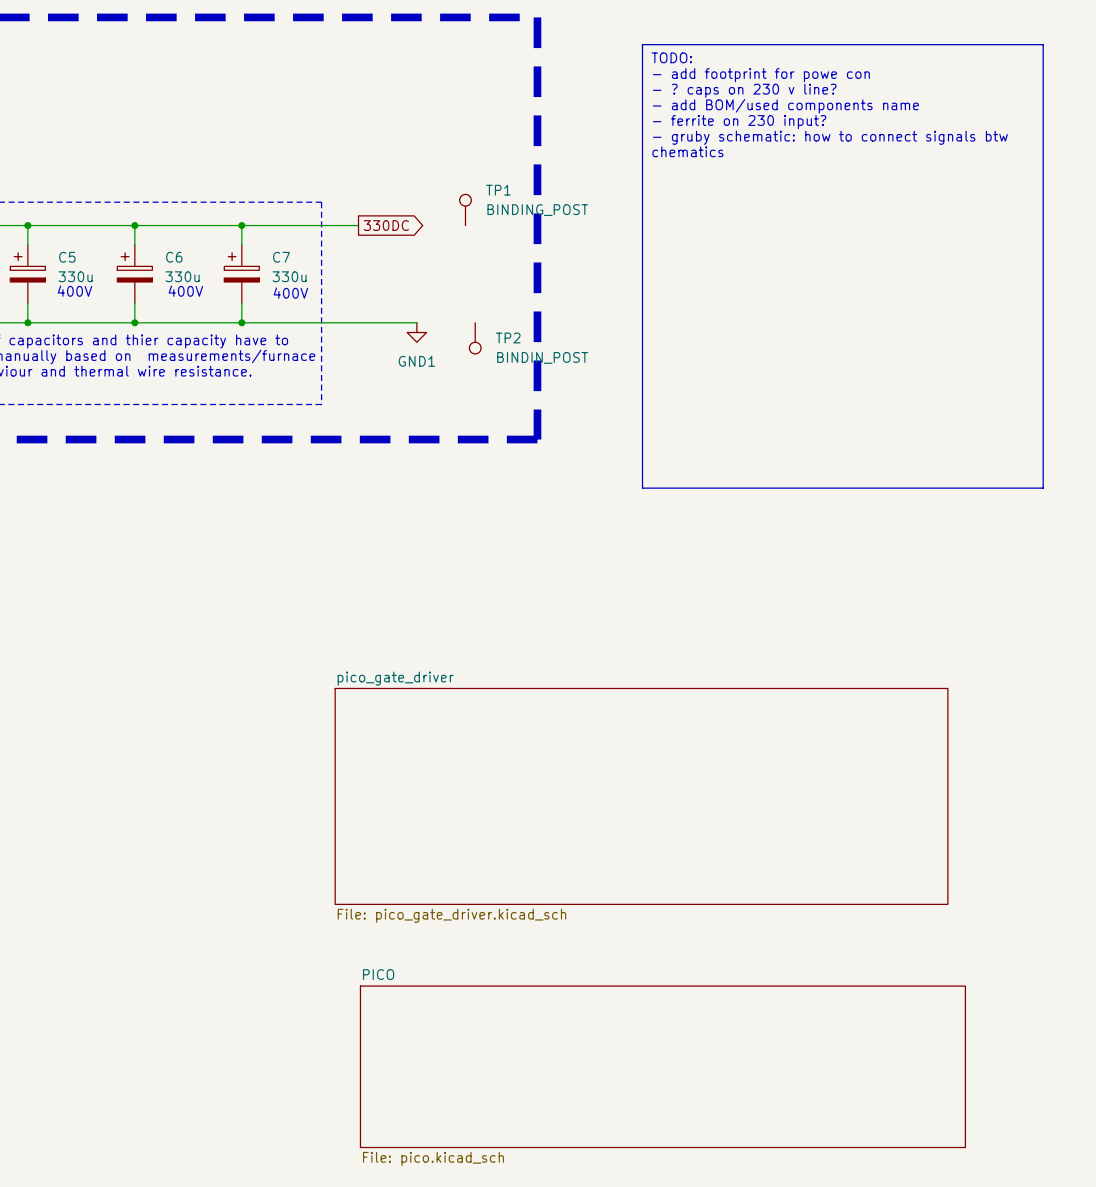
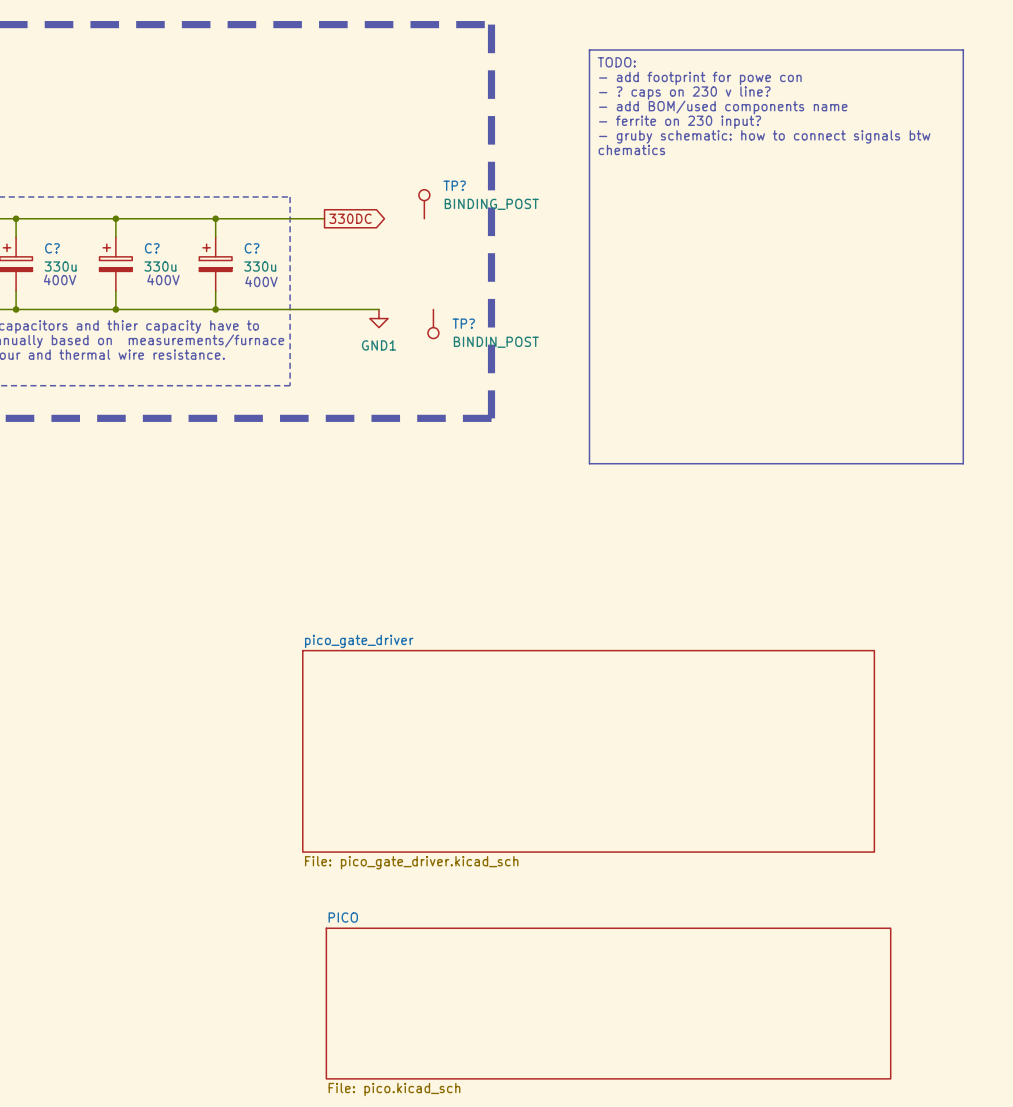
TP1 name: TP1 (498, 190) -> TP? (454, 185)
C5 name: C5 (67, 257) -> C? (52, 248)
C6 name: C6 (174, 257) -> C? (152, 248)
C7 name: C7 (281, 257) -> C? (252, 248)
TP2 name: TP2 (508, 338) -> TP? (463, 323)

